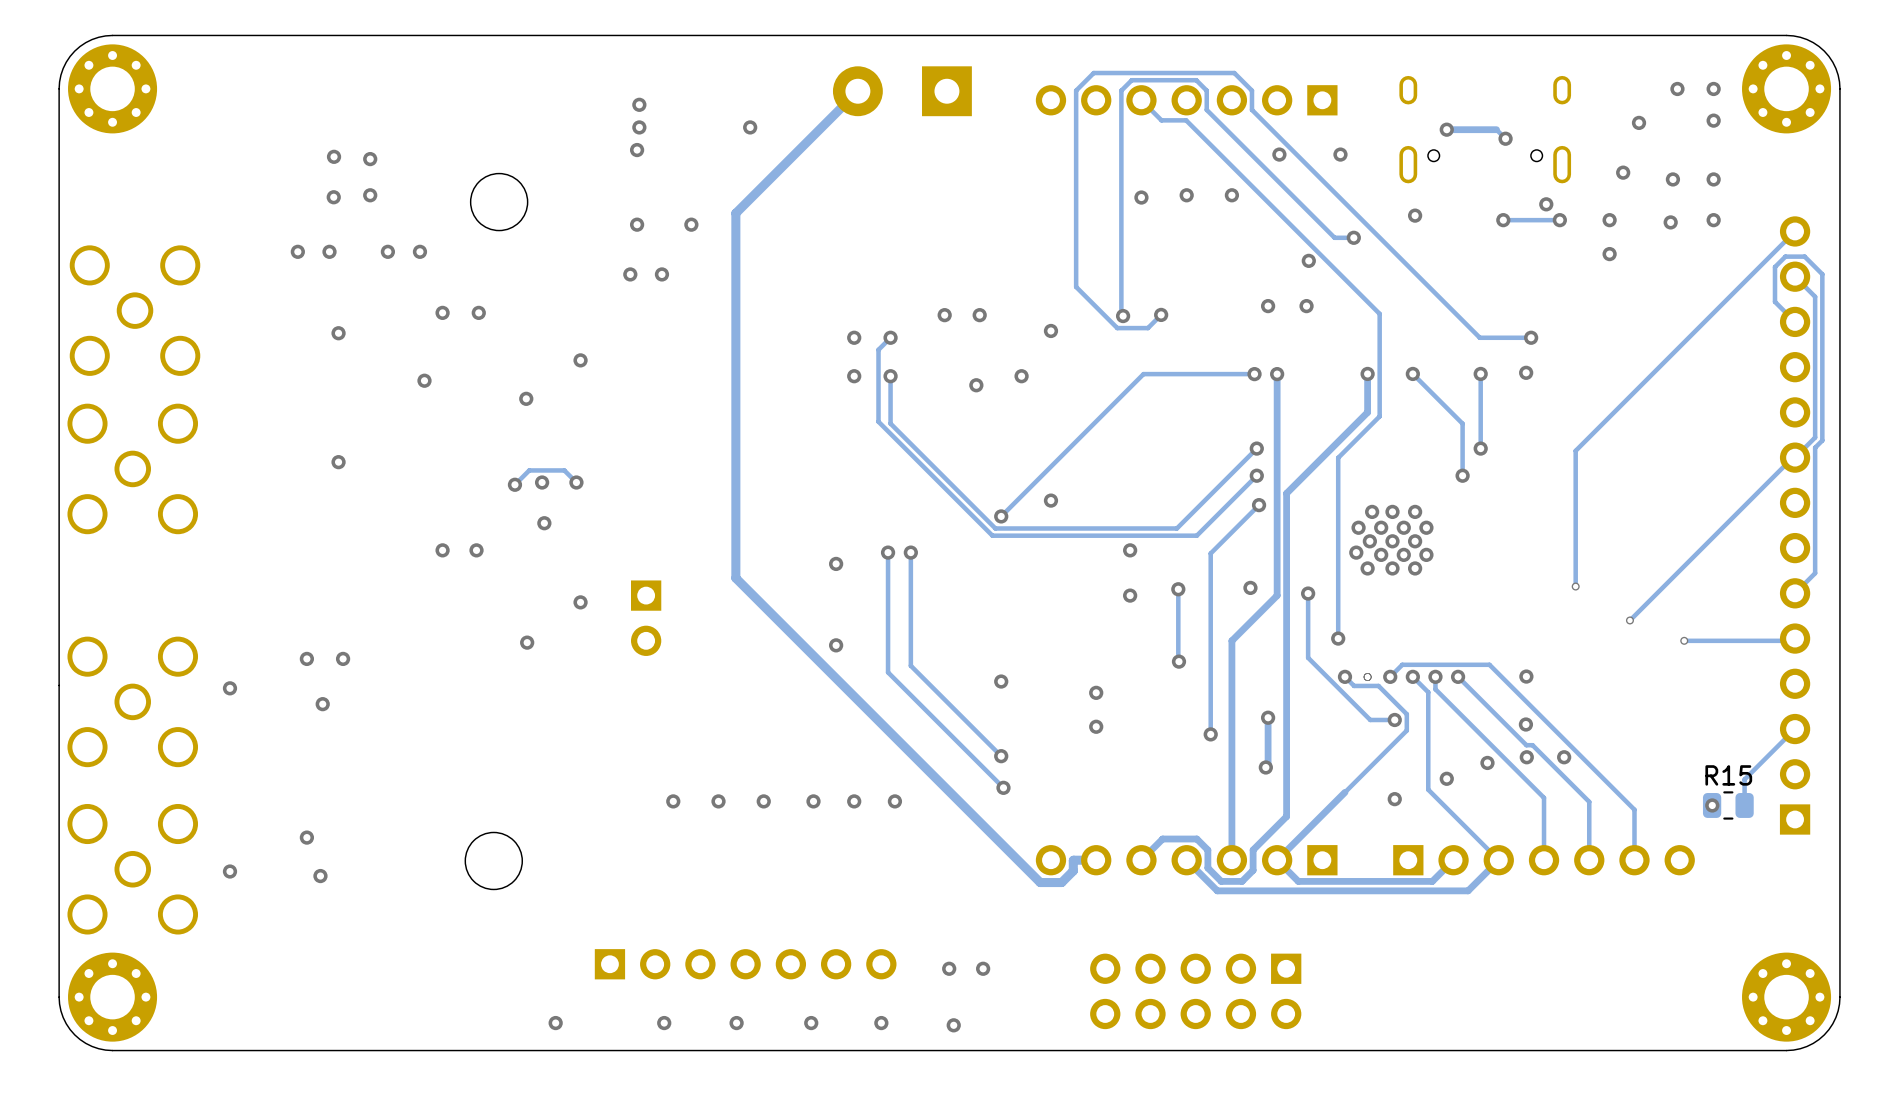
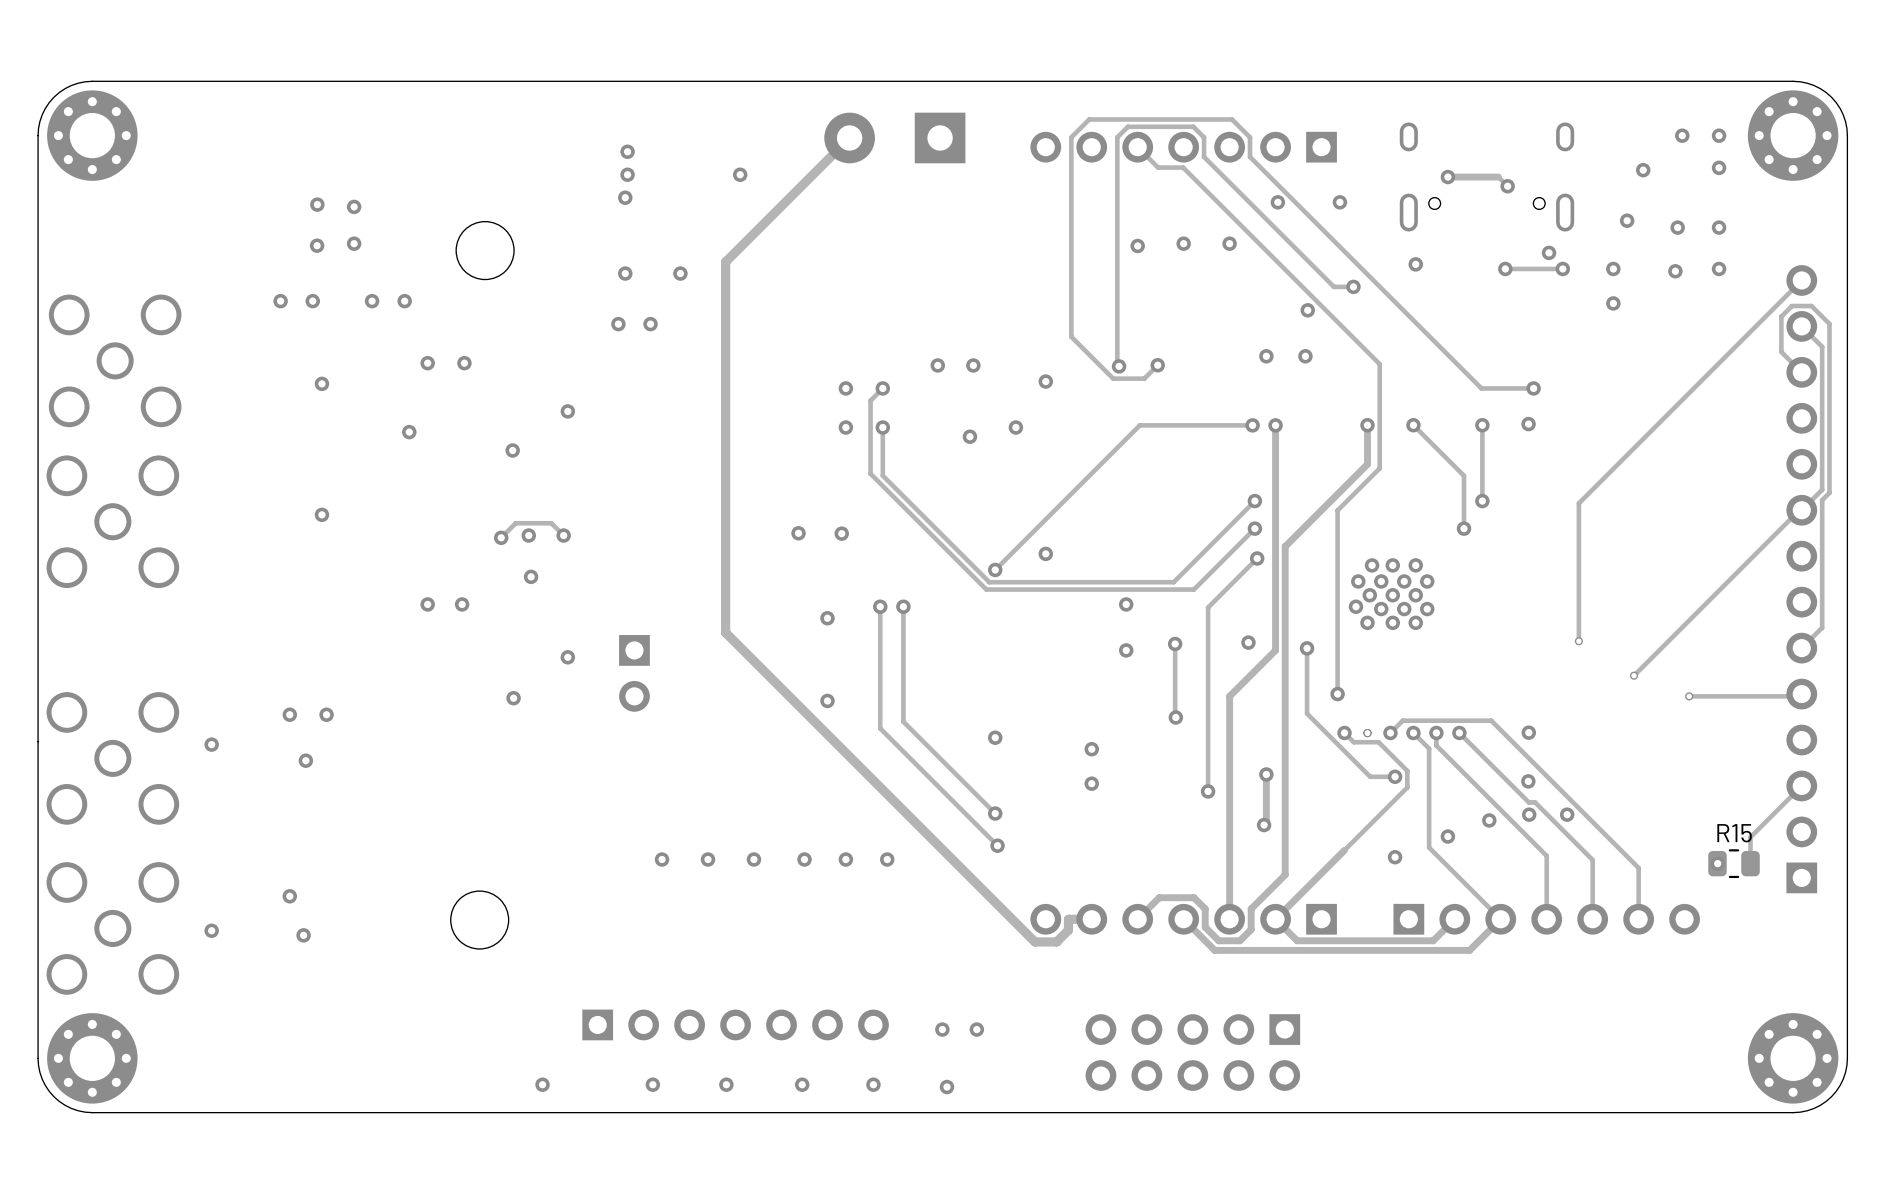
via: none -> (798, 533)
via: none -> (841, 533)

